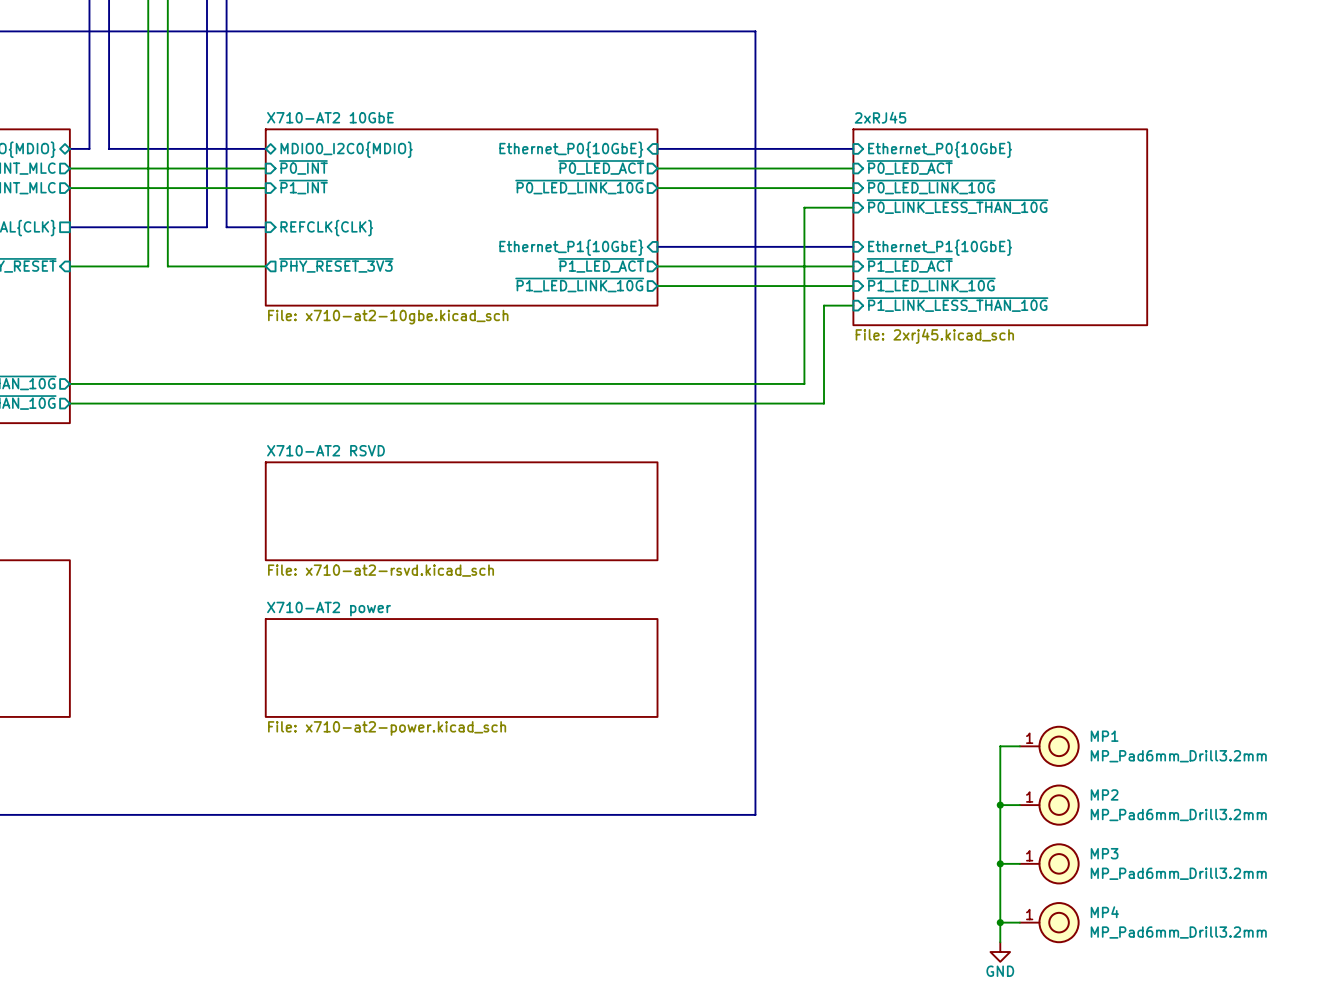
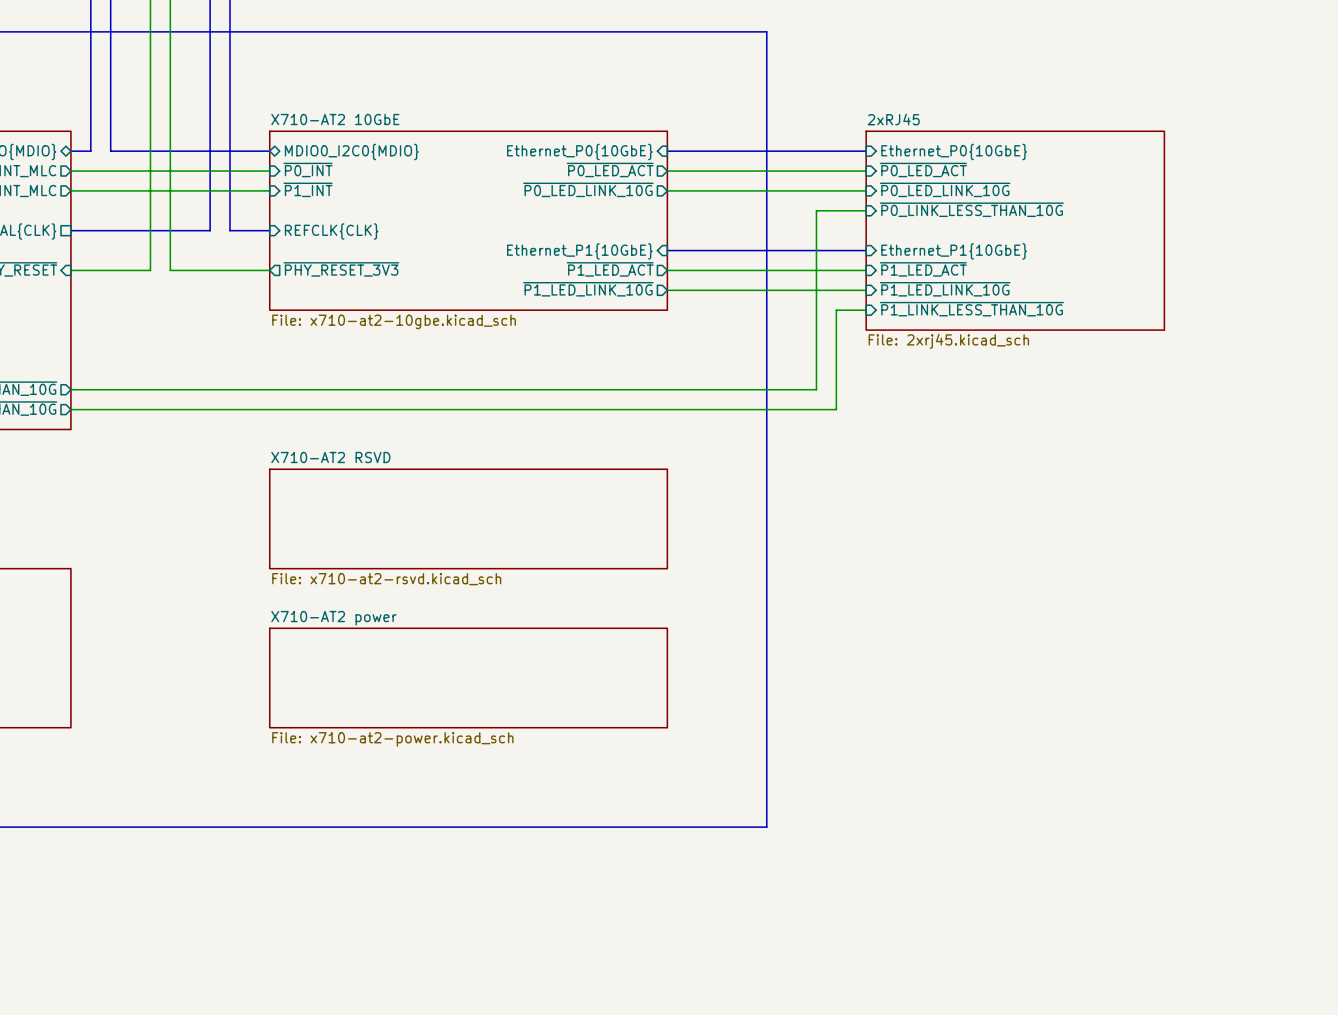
wire: (1019, 746) (1000, 746) (1000, 942) -> none
MP1: MP_Pad6mm_Drill3.2mm (1049, 746) -> none
wire: (1000, 805) (1019, 805) -> none
junction: (1000, 805) -> none
MP2: MP_Pad6mm_Drill3.2mm (1049, 805) -> none
wire: (1000, 863) (1019, 863) -> none
junction: (1000, 863) -> none
MP3: MP_Pad6mm_Drill3.2mm (1049, 863) -> none
wire: (1000, 922) (1019, 922) -> none
junction: (1000, 922) -> none
MP4: MP_Pad6mm_Drill3.2mm (1049, 922) -> none
power symbol: GND (1000, 952) -> none

